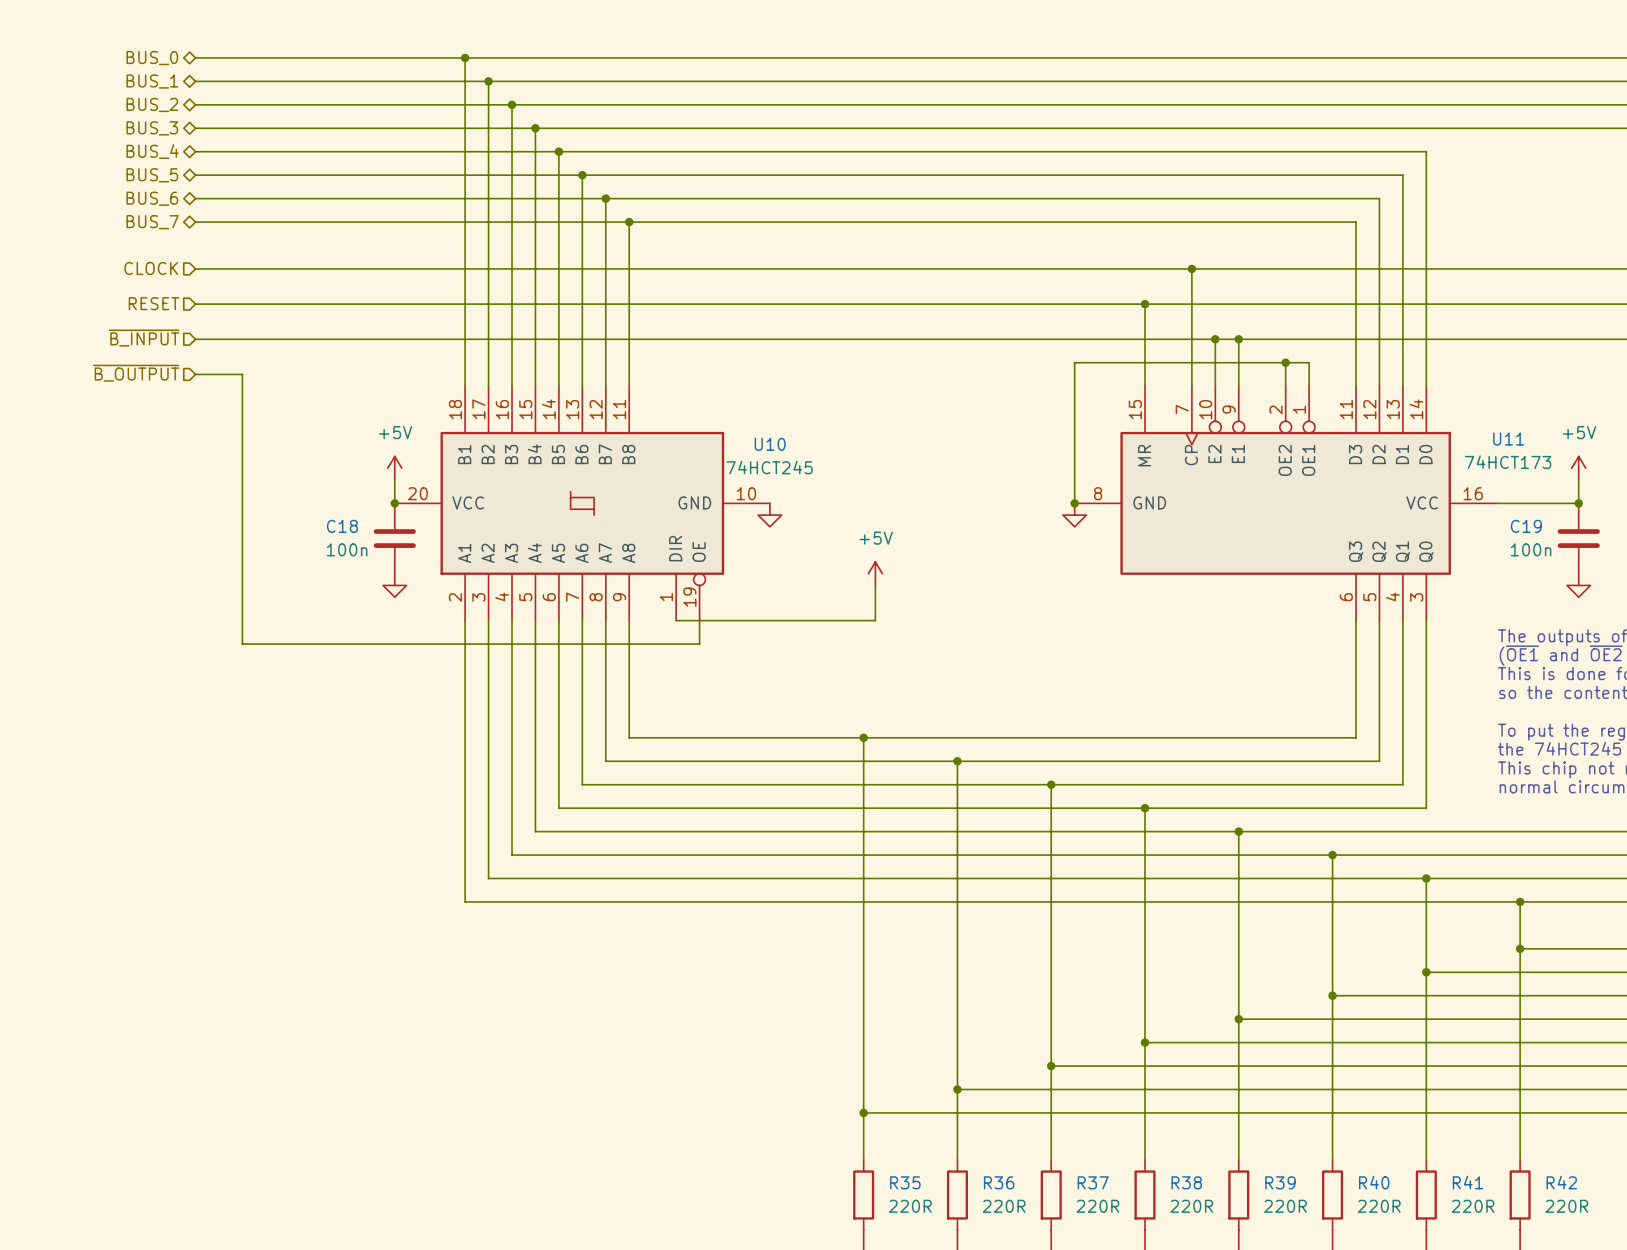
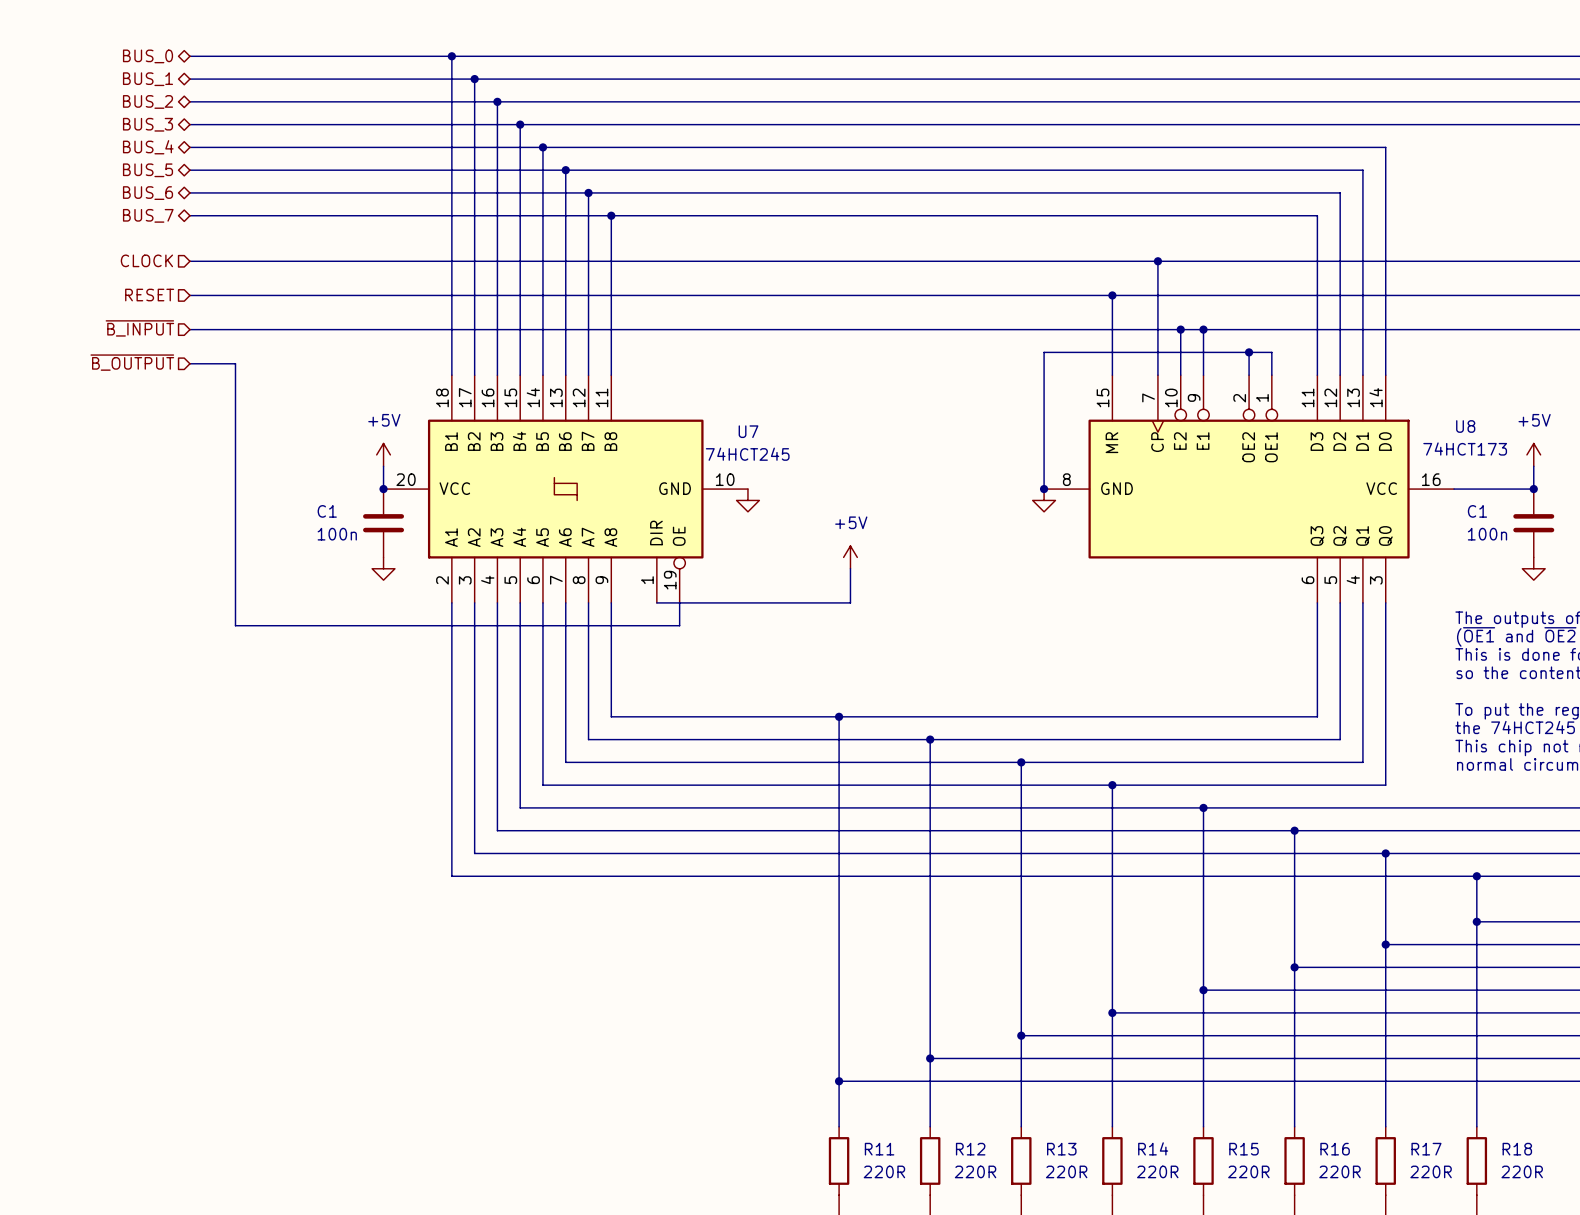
U11 name: U11 (1508, 439) -> U8 (1465, 426)
U10 name: U10 (770, 444) -> U7 (748, 431)
C18 name: C18 (342, 526) -> C1 (327, 511)
C19 name: C19 (1526, 526) -> C1 (1477, 511)
R35 name: R35 (905, 1182) -> R11 (879, 1149)
R36 name: R36 (999, 1182) -> R12 (970, 1149)
R37 name: R37 (1093, 1182) -> R13 (1061, 1149)
R38 name: R38 (1186, 1182) -> R14 (1153, 1148)
R39 name: R39 (1280, 1182) -> R15 (1243, 1149)
R40 name: R40 (1374, 1182) -> R16 (1335, 1149)
R41 name: R41 (1468, 1182) -> R17 (1426, 1149)
R42 name: R42 (1561, 1182) -> R18 (1517, 1149)

